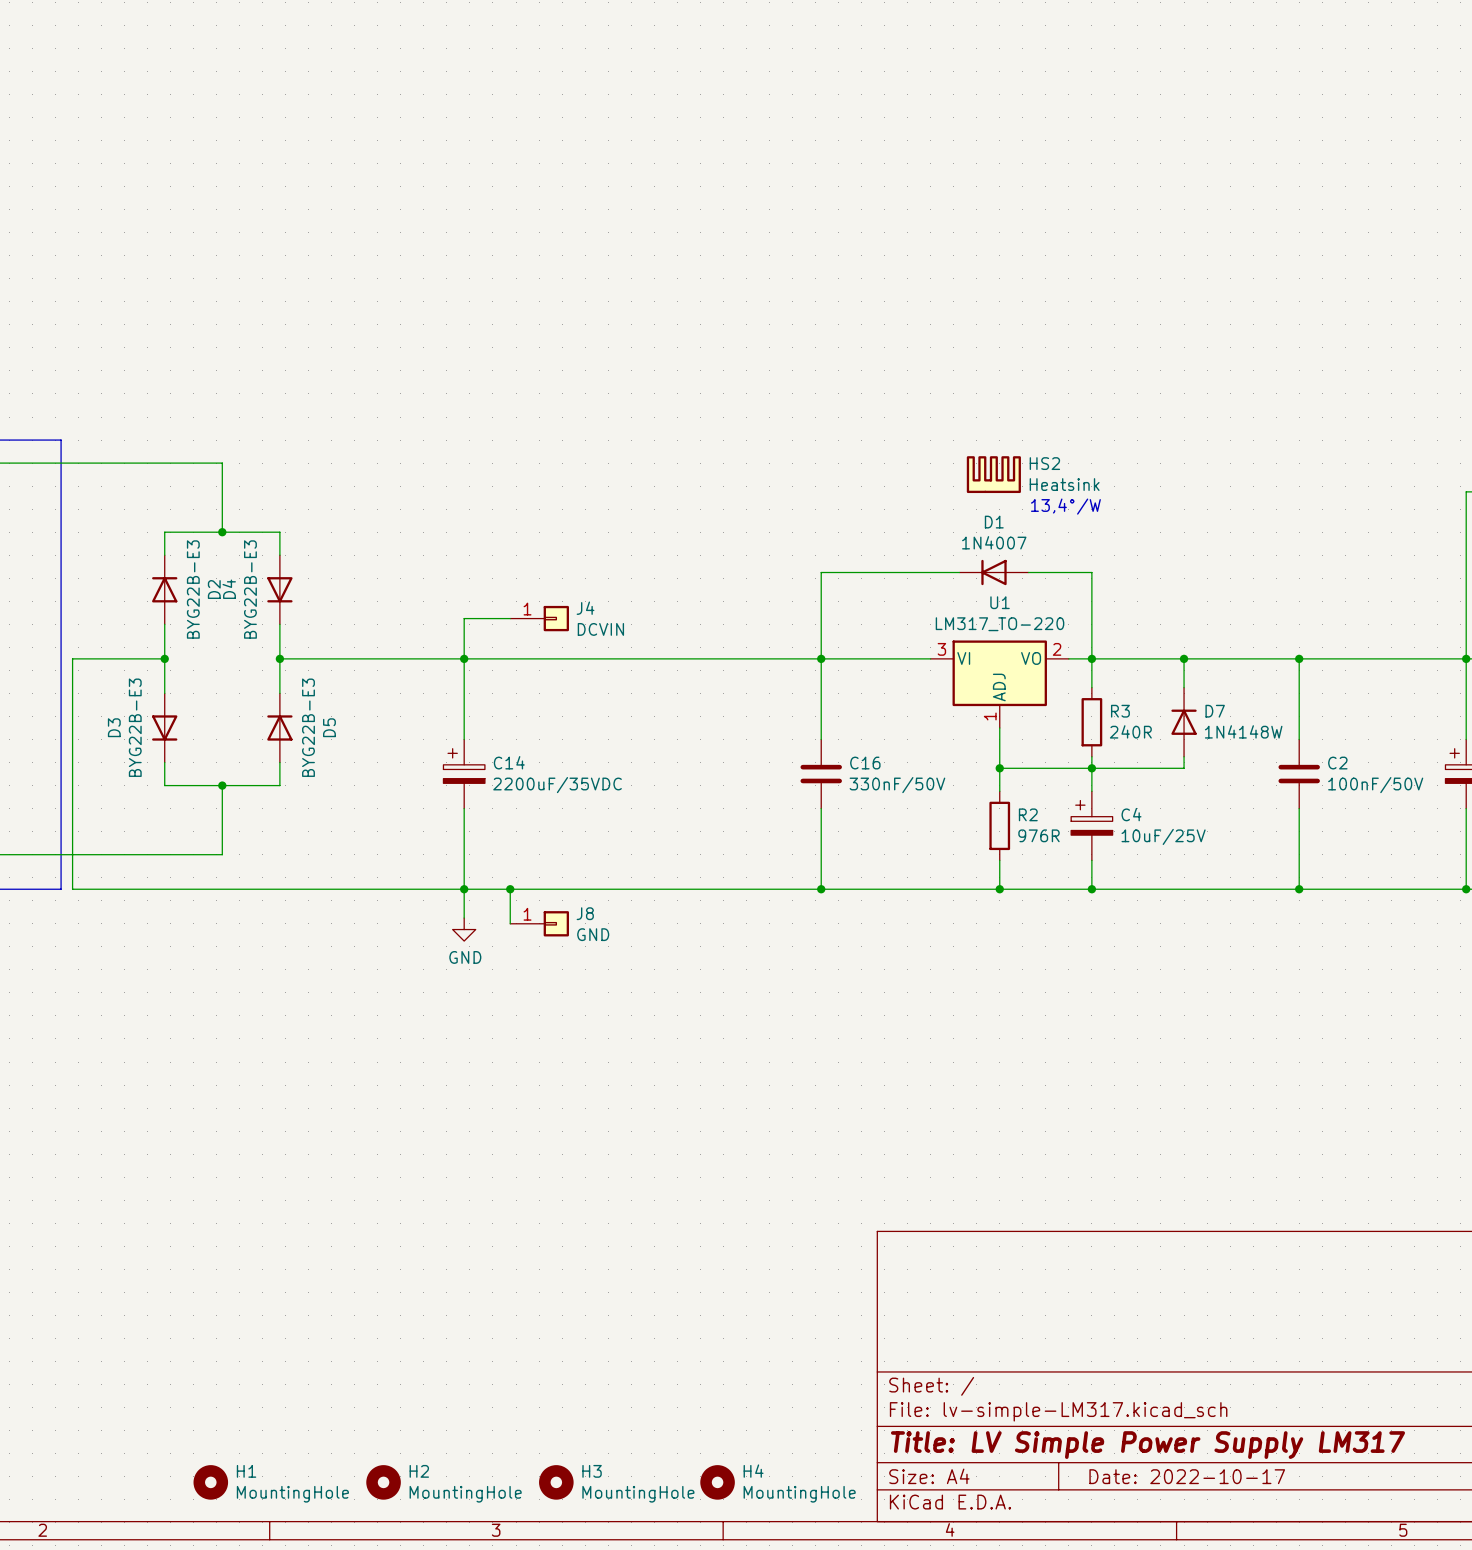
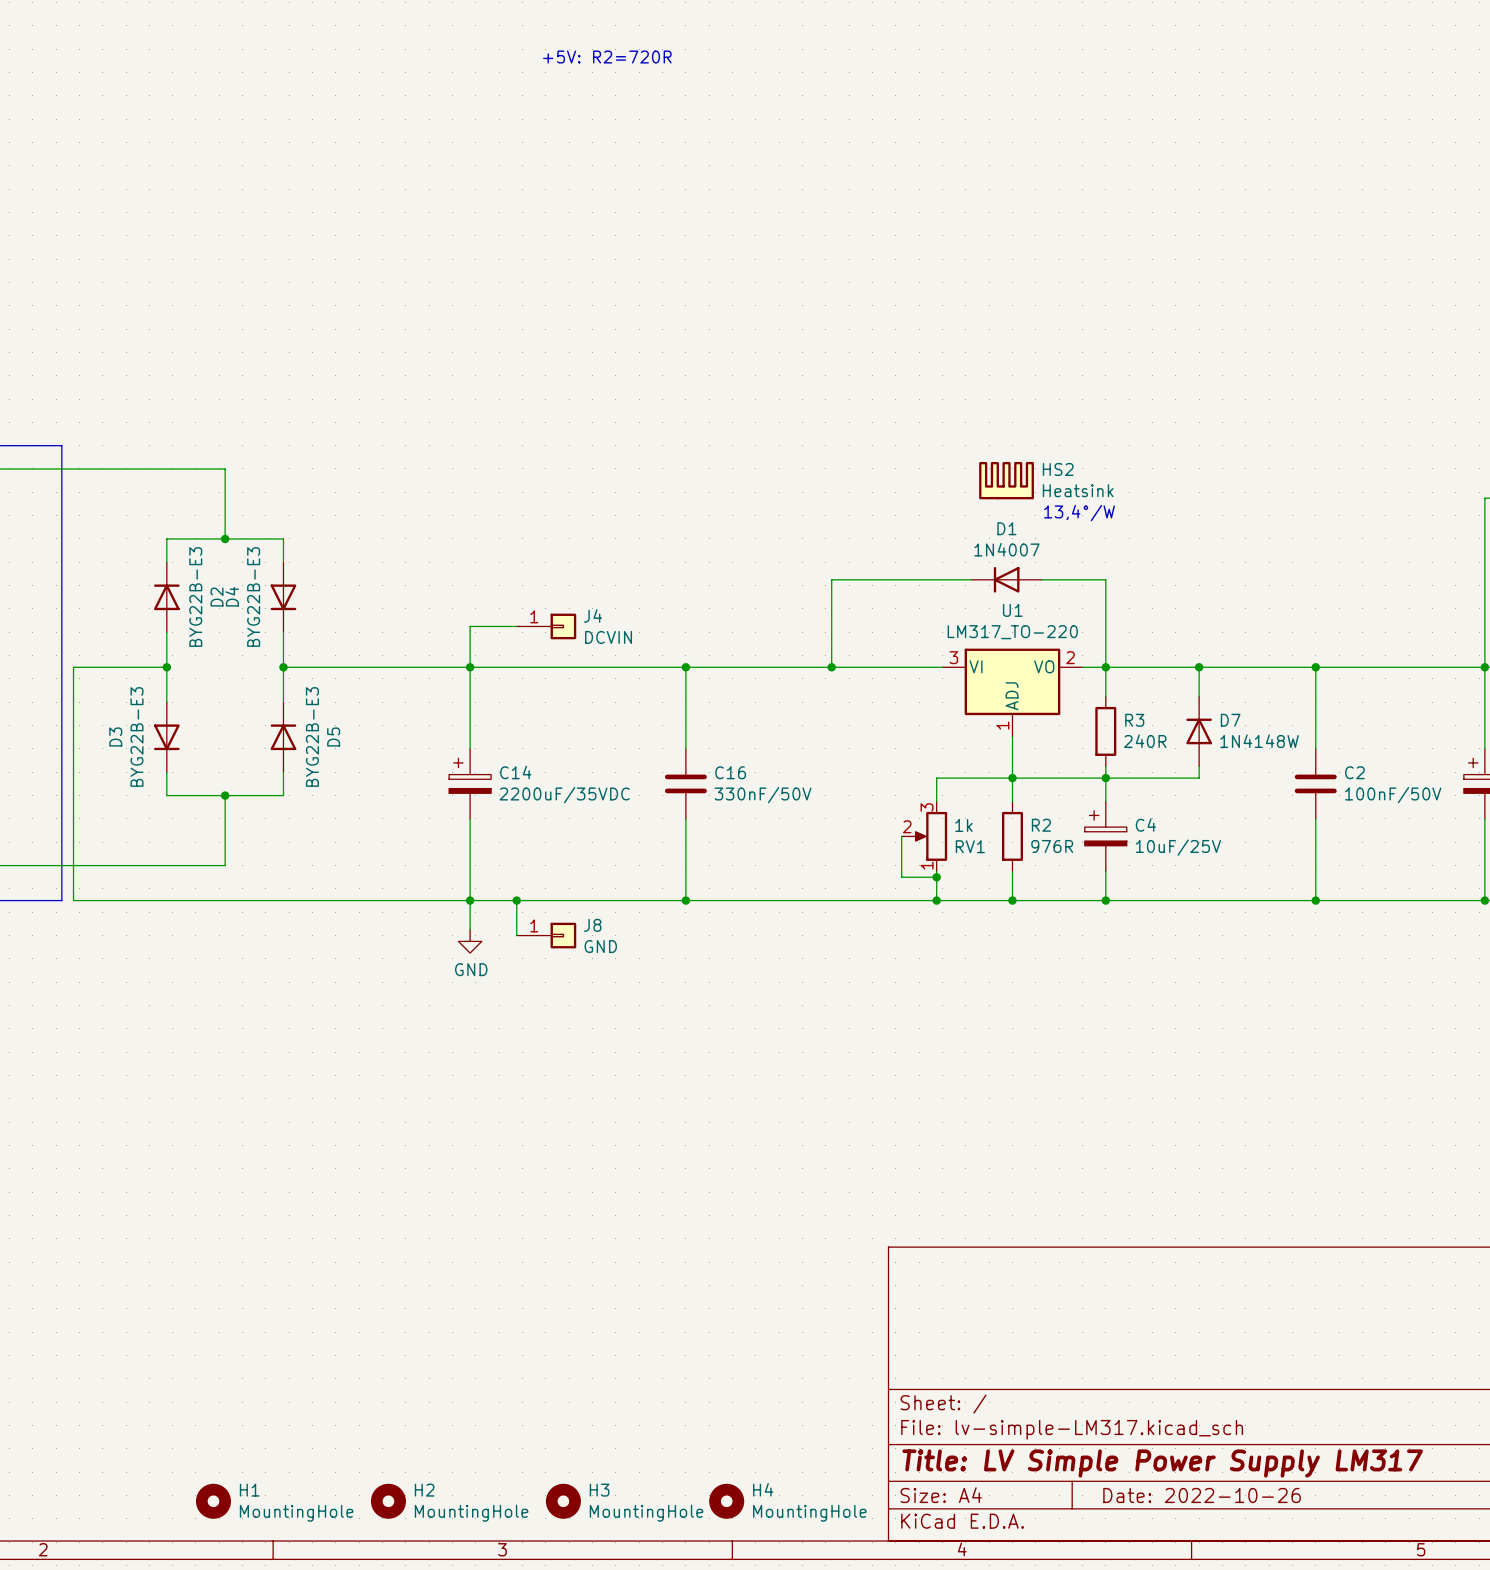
text: none -> +5V: R2=720R (607, 57)
junction: none -> (685, 667)
wire: (821, 658) (821, 739) -> (685, 667) (685, 748)
wire: none -> (1012, 778) (936, 778) (936, 801)
C16 position: (821, 774) -> (685, 783)
wire: (821, 808) (821, 889) -> (685, 818) (685, 900)
wire: none -> (901, 836) (901, 877) (936, 877)
RV1: none -> 1k (924, 836)
wire: none -> (936, 871) (936, 900)
junction: none -> (936, 877)
junction: none -> (685, 900)
junction: (821, 889) -> none
junction: none -> (936, 900)
title block: Date: 2022-10-17 (1187, 1476) -> Date: 2022-10-26 (1202, 1495)

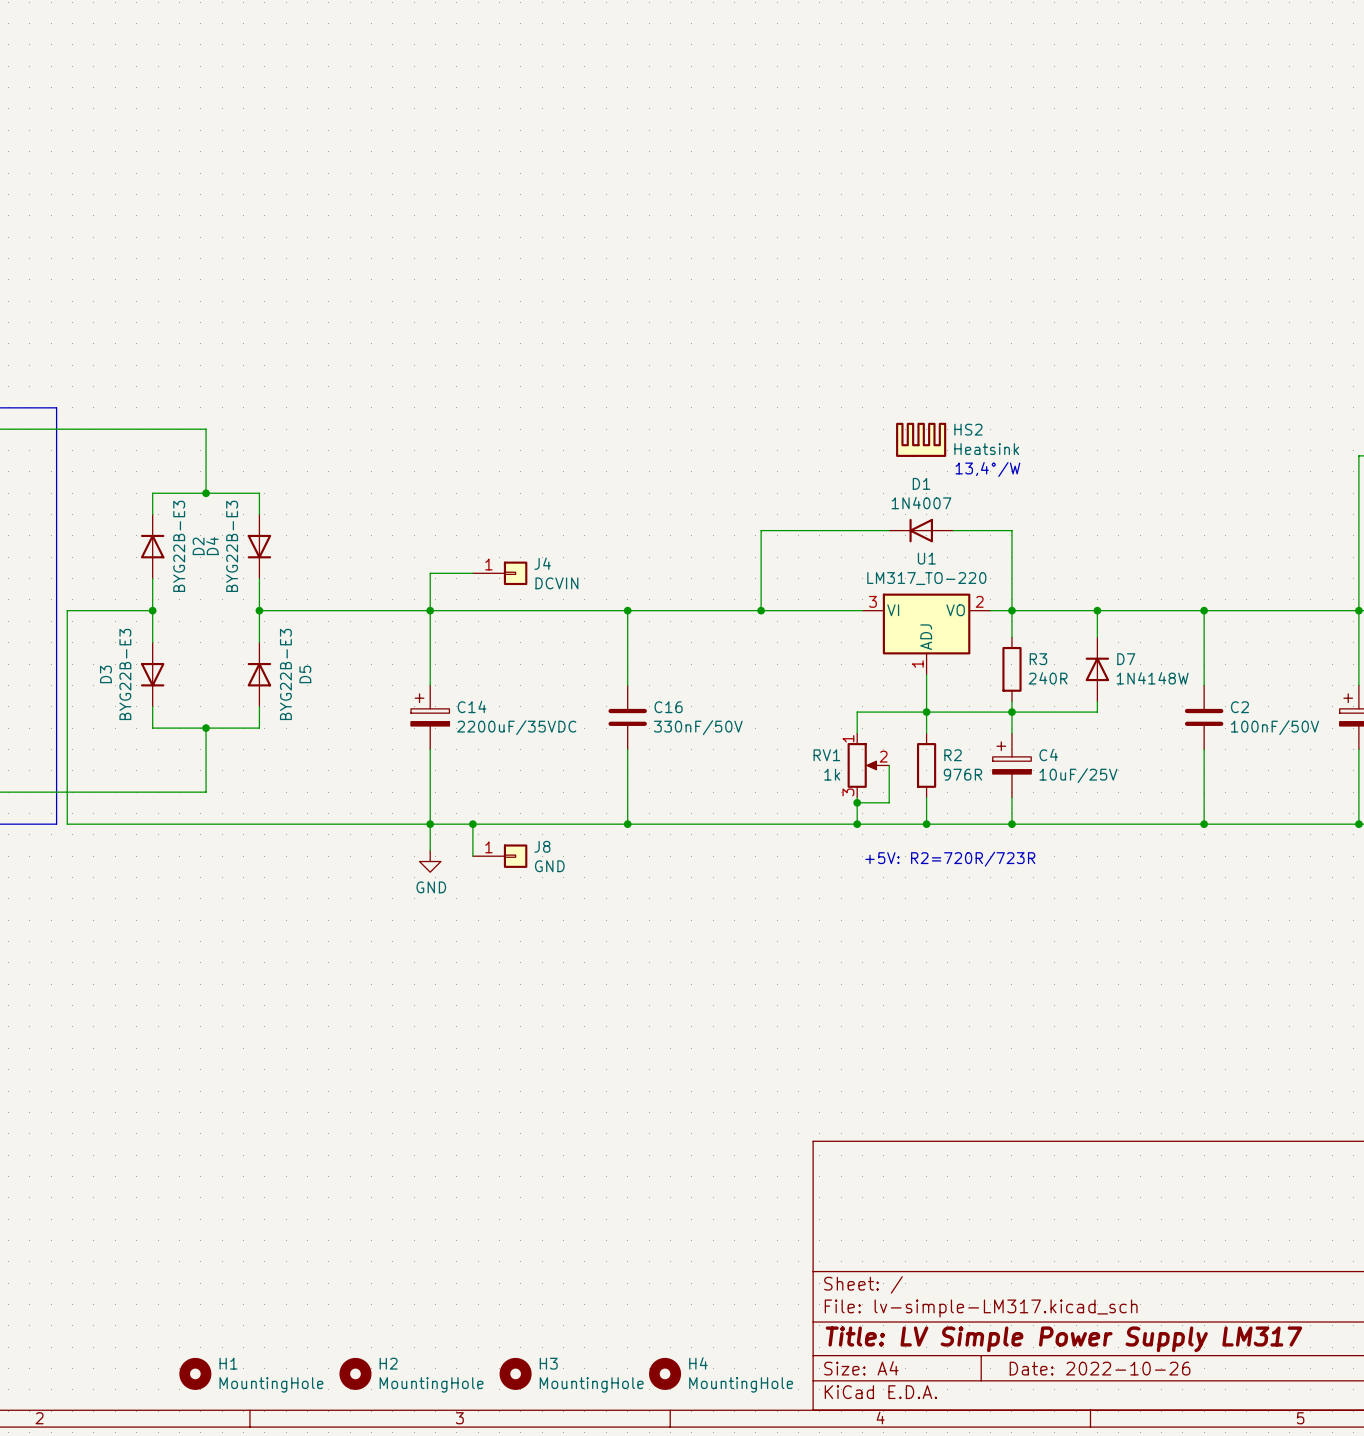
text: +5V: R2=720R (607, 57) -> none
wire: (901, 836) (901, 877) (936, 877) -> (889, 765) (889, 802) (857, 802)
RV1 rotation: 0° (930, 836) -> 180° (863, 765)
text: none -> +5V: R2=720R/723R (950, 859)

